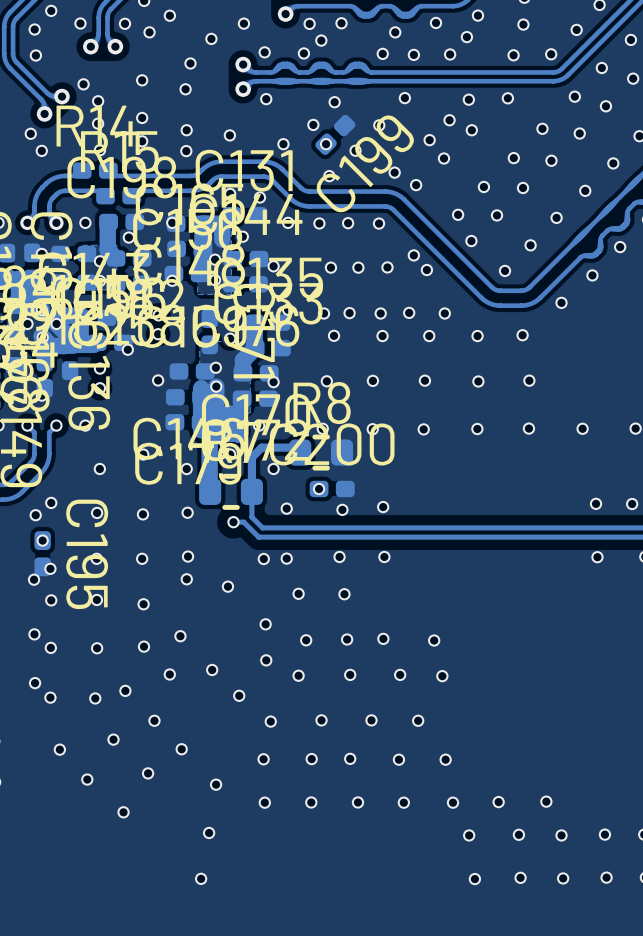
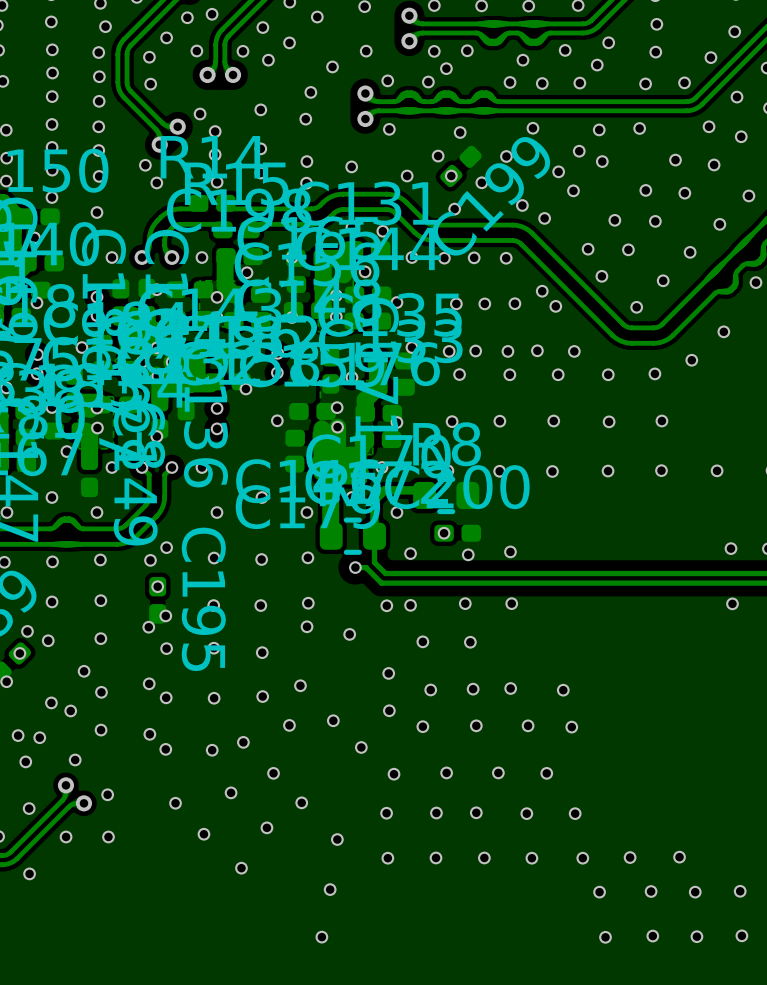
via: (592, 275) -> none
via: none -> (723, 331)
via: (561, 302) -> none
via: none -> (691, 360)

